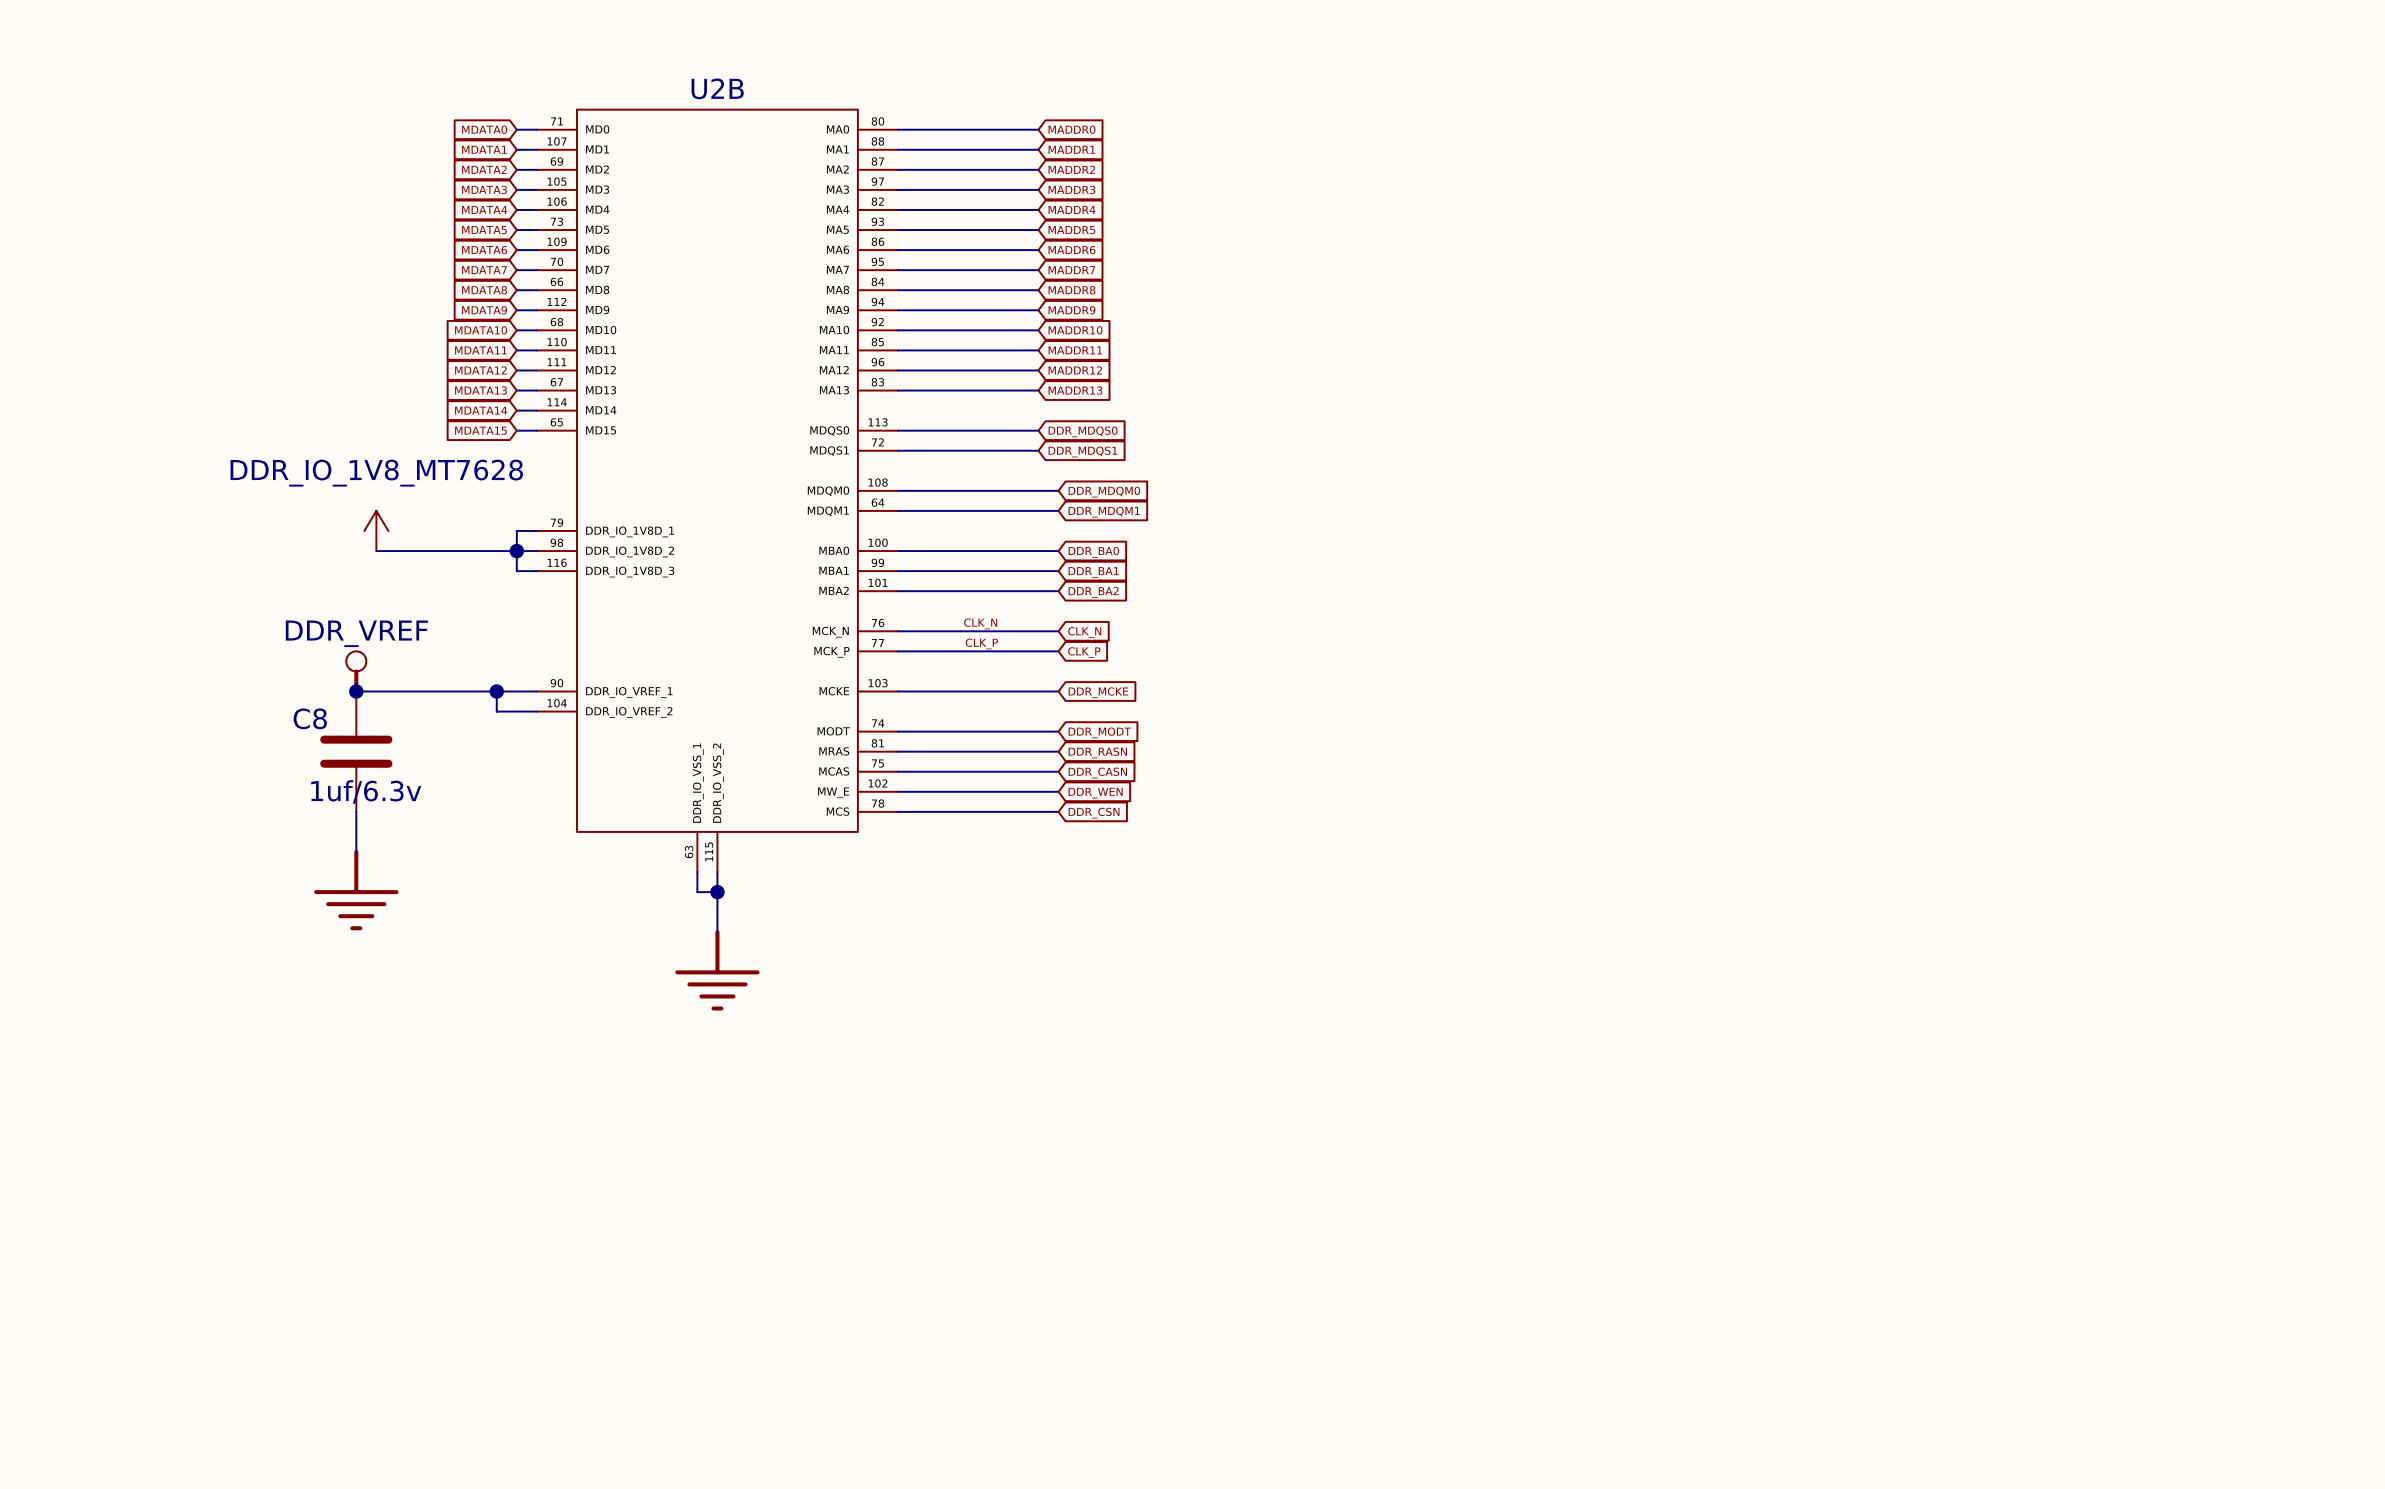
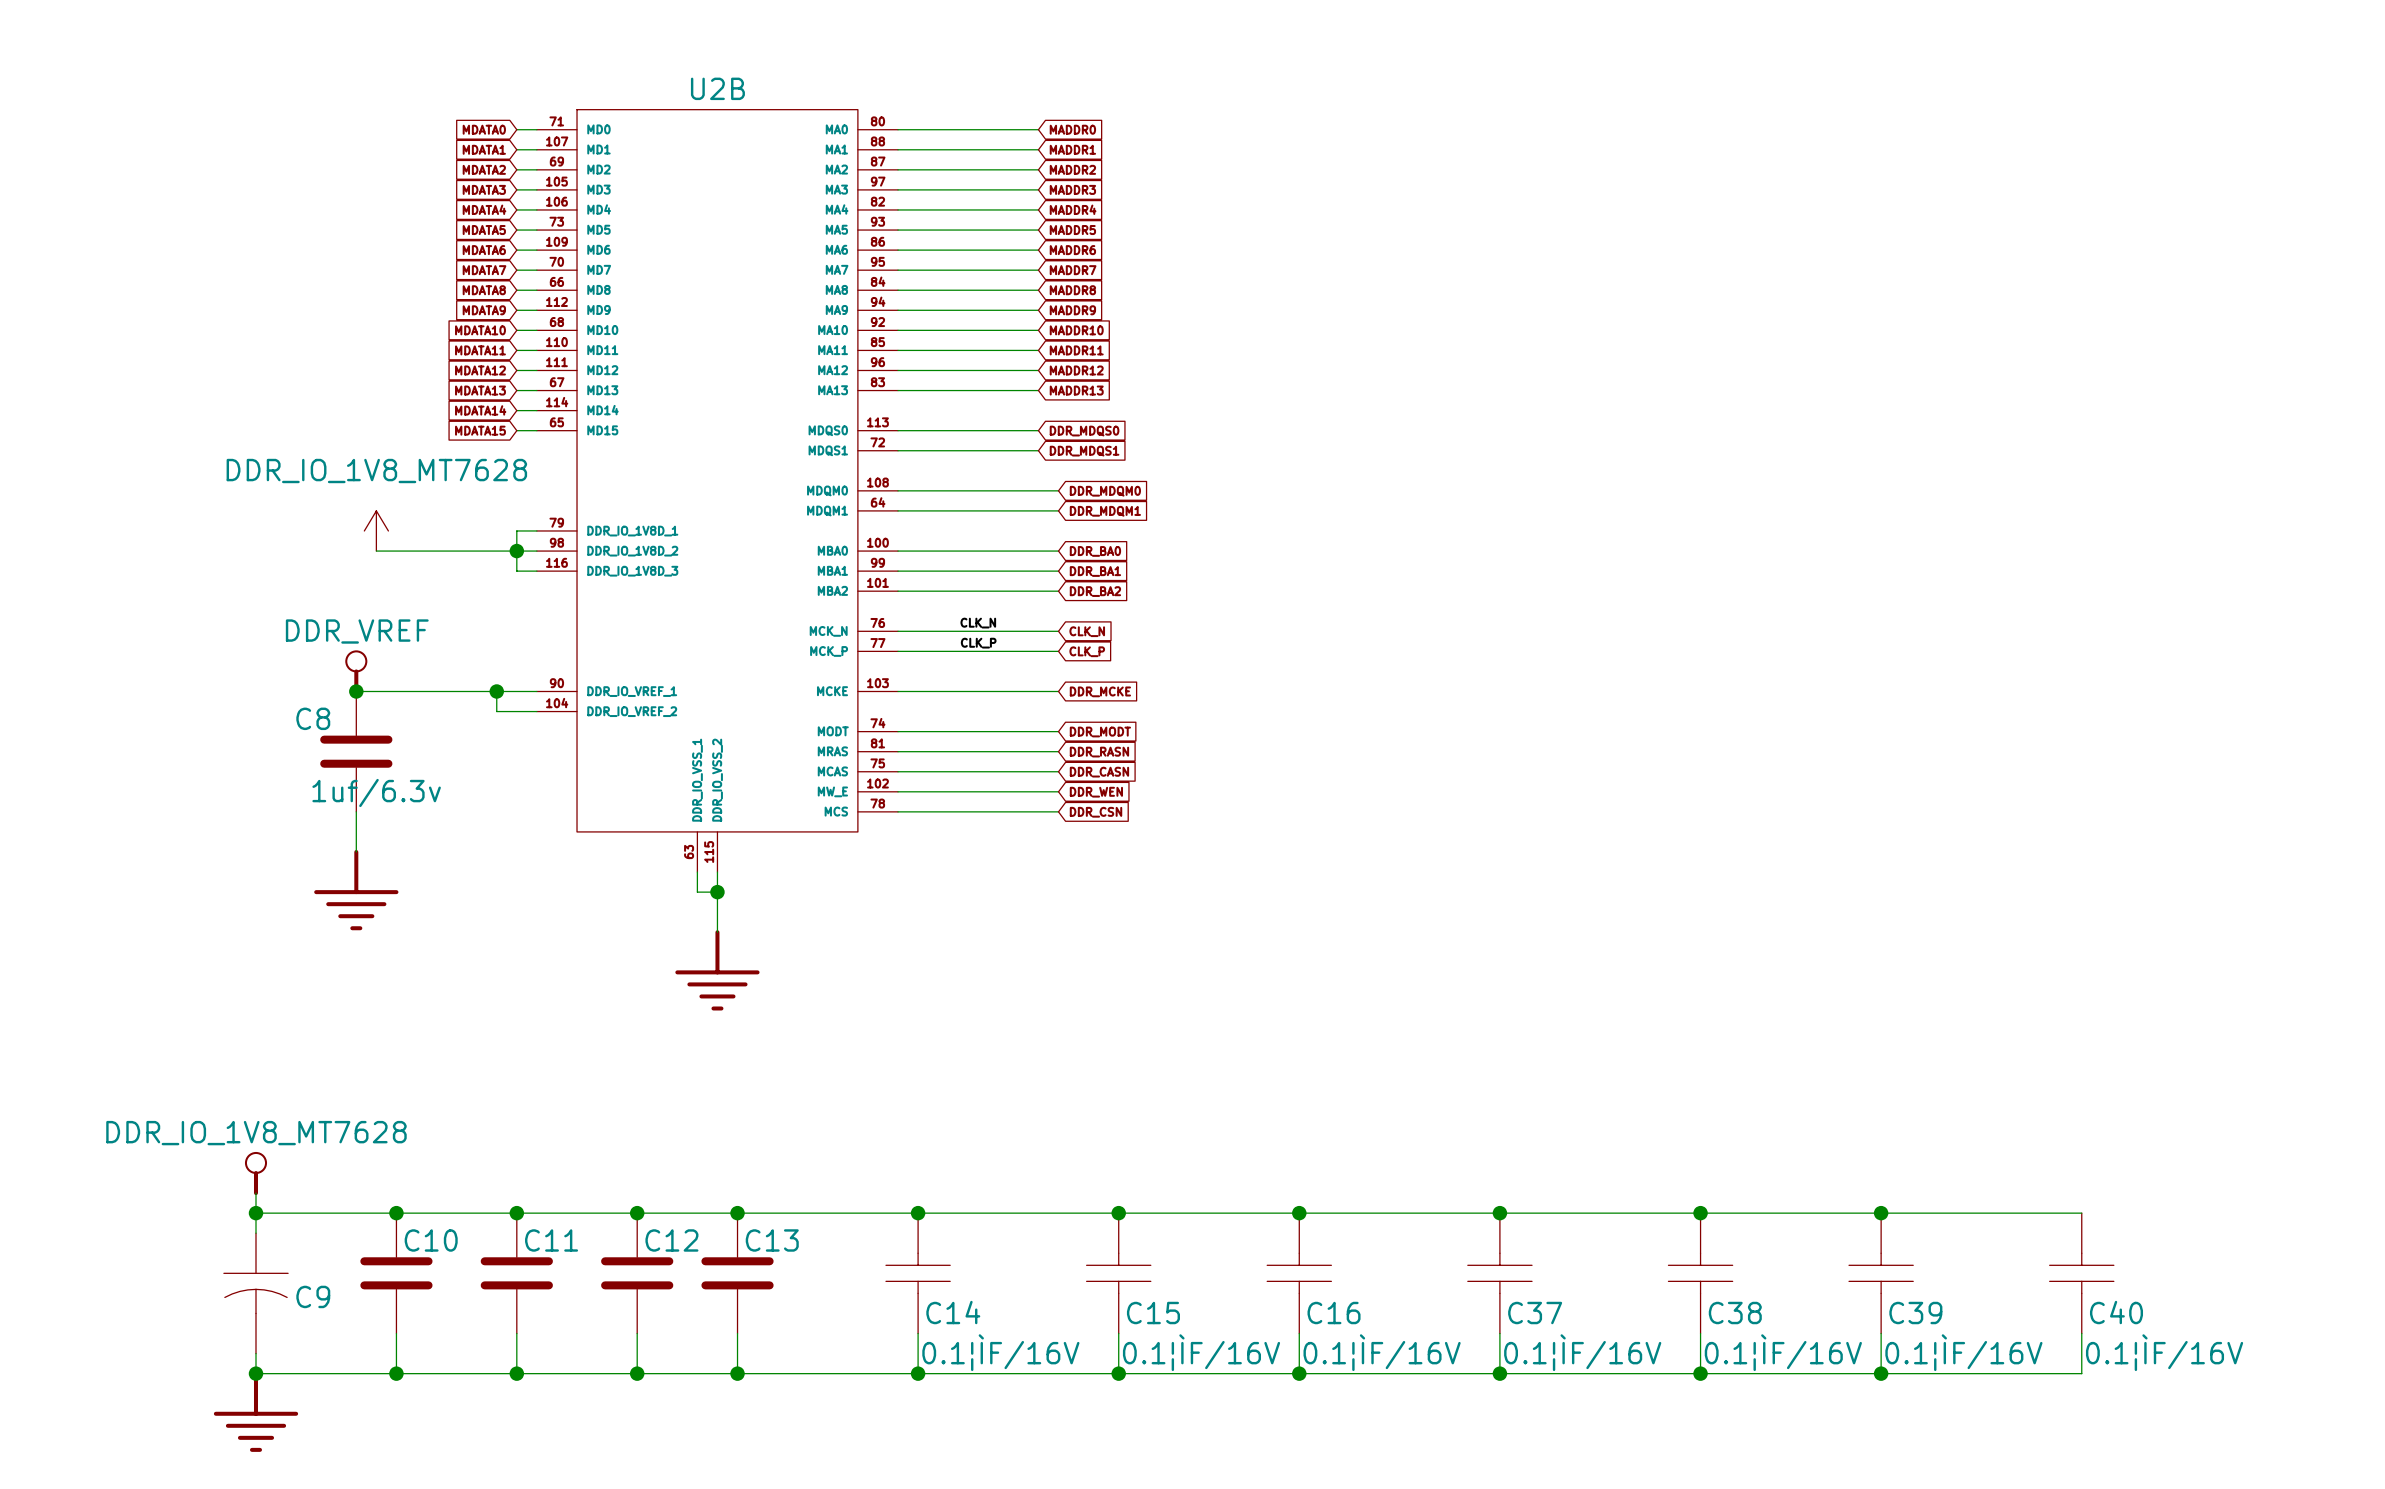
power symbol: none -> DDR_IO_1V8_MT7628 (255, 1173)
wire: none -> (255, 1193) (255, 1233)
wire: none -> (255, 1213) (2081, 1213)
junction: none -> (255, 1213)
junction: none -> (396, 1213)
junction: none -> (516, 1213)
junction: none -> (637, 1213)
junction: none -> (737, 1213)
junction: none -> (918, 1213)
junction: none -> (1118, 1213)
junction: none -> (1299, 1213)
junction: none -> (1499, 1213)
junction: none -> (1700, 1213)
junction: none -> (1881, 1213)
C10: none -> (396, 1273)
C11: none -> (516, 1273)
C12: none -> (637, 1273)
C13: none -> (737, 1273)
C14: none -> (918, 1273)
C15: none -> (1118, 1273)
C16: none -> (1299, 1273)
C37: none -> (1499, 1273)
C38: none -> (1700, 1273)
C39: none -> (1881, 1273)
C40: none -> (2081, 1273)
C9: none -> (255, 1293)
wire: none -> (396, 1333) (396, 1373)
wire: none -> (516, 1333) (516, 1373)
wire: none -> (637, 1333) (637, 1373)
wire: none -> (737, 1333) (737, 1373)
wire: none -> (918, 1333) (918, 1373)
wire: none -> (1118, 1333) (1118, 1373)
wire: none -> (1299, 1333) (1299, 1373)
wire: none -> (1499, 1333) (1499, 1373)
wire: none -> (1700, 1333) (1700, 1373)
wire: none -> (1881, 1333) (1881, 1373)
wire: none -> (2081, 1333) (2081, 1373) (255, 1373) (255, 1353)
junction: none -> (255, 1373)
junction: none -> (396, 1373)
junction: none -> (516, 1373)
junction: none -> (637, 1373)
junction: none -> (737, 1373)
junction: none -> (918, 1373)
junction: none -> (1118, 1373)
junction: none -> (1299, 1373)
junction: none -> (1499, 1373)
junction: none -> (1700, 1373)
junction: none -> (1881, 1373)
power symbol: none -> (255, 1411)

